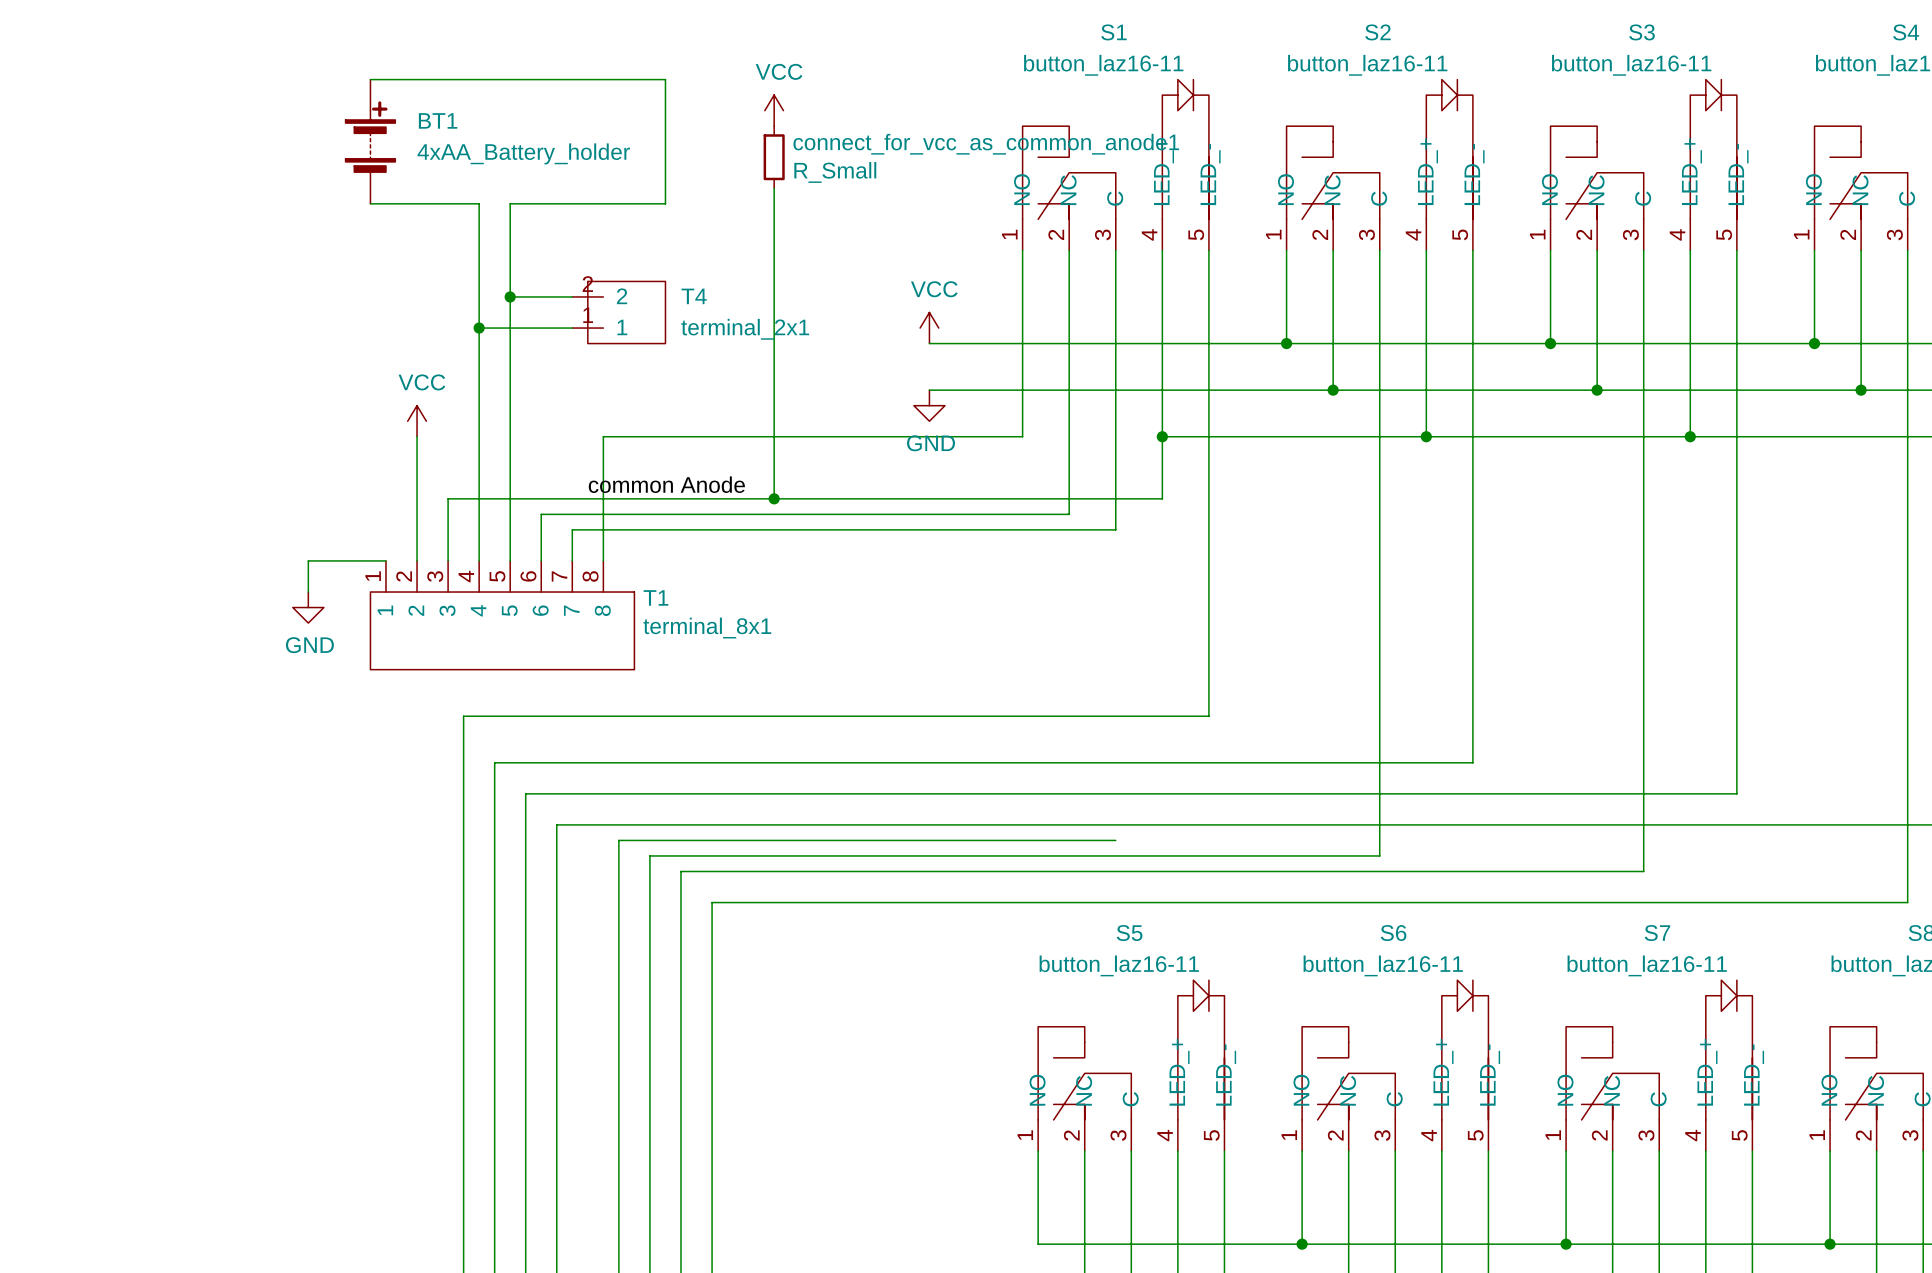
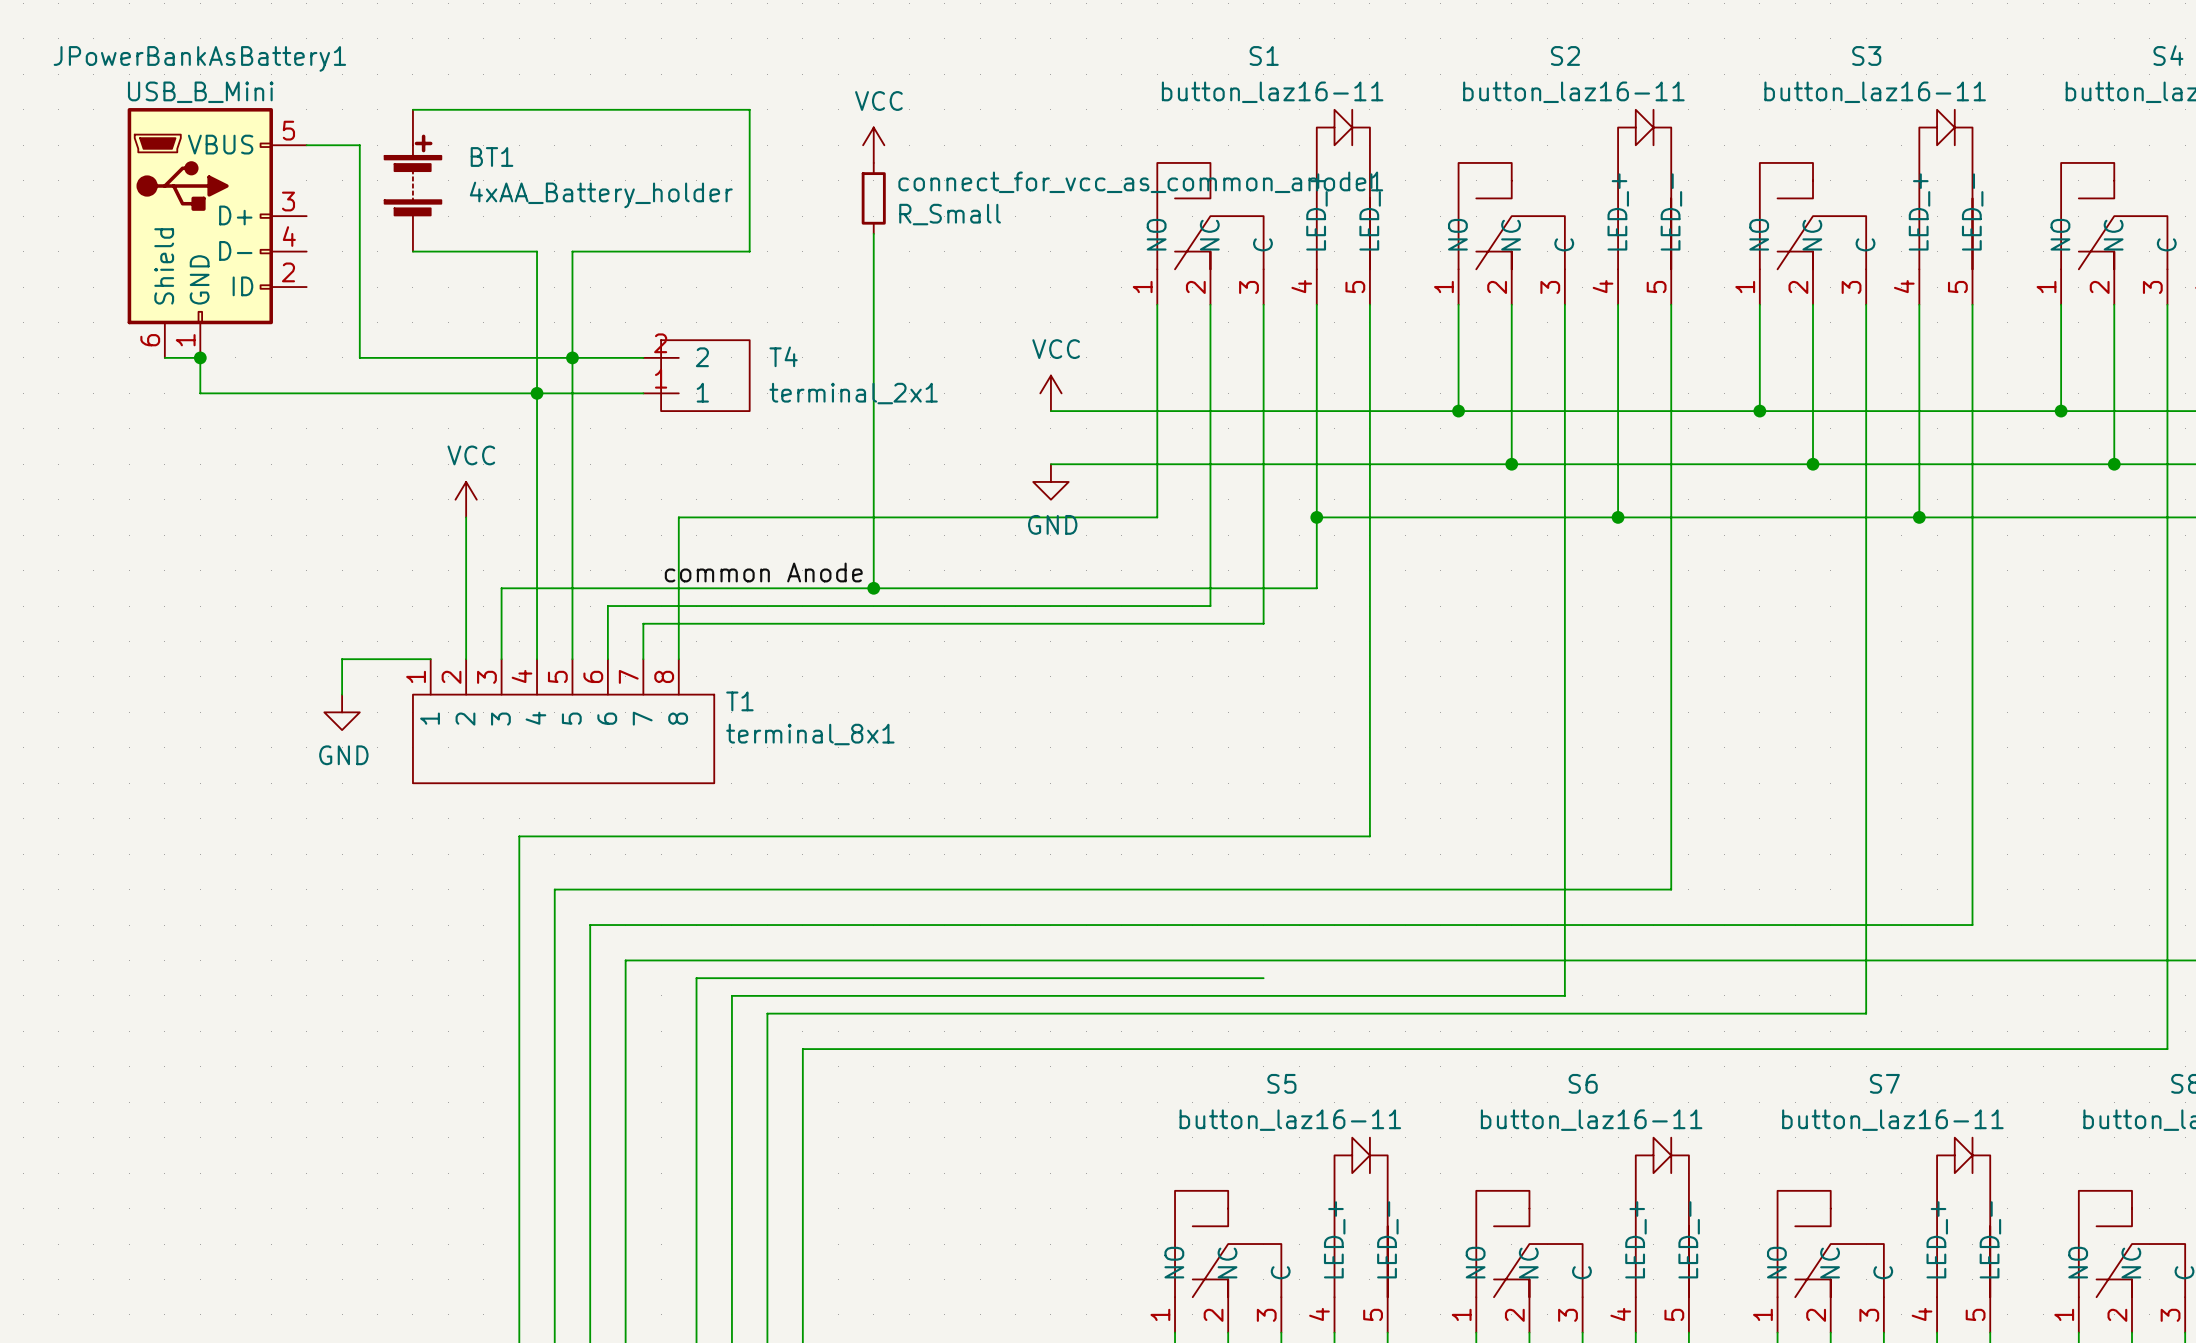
wire: none -> (306, 145) (359, 145) (359, 357) (572, 357)
JPowerBankAsBattery1: none -> USB_B_Mini (217, 232)
wire: none -> (164, 357) (200, 357) (200, 393) (537, 393)
junction: none -> (200, 357)

